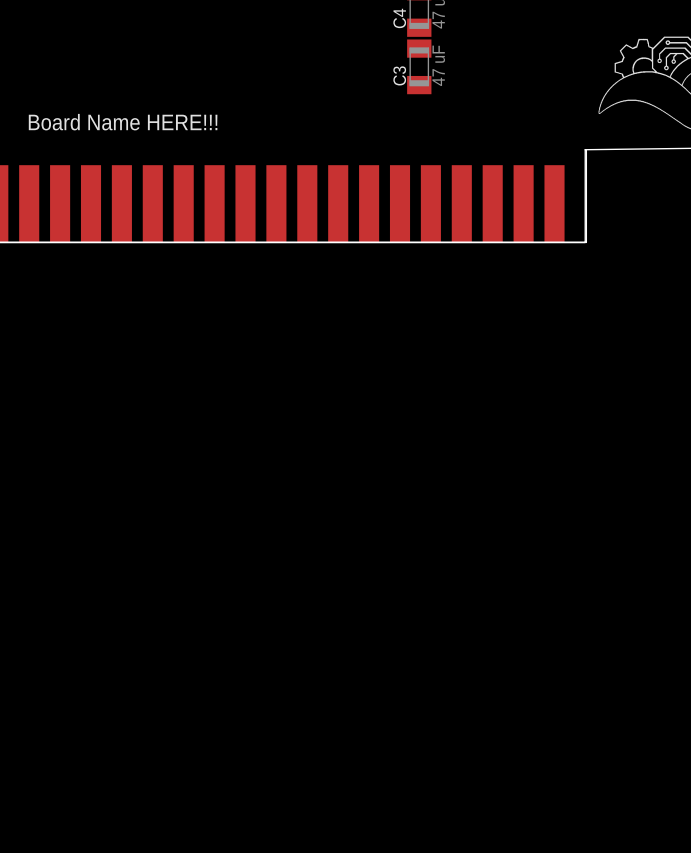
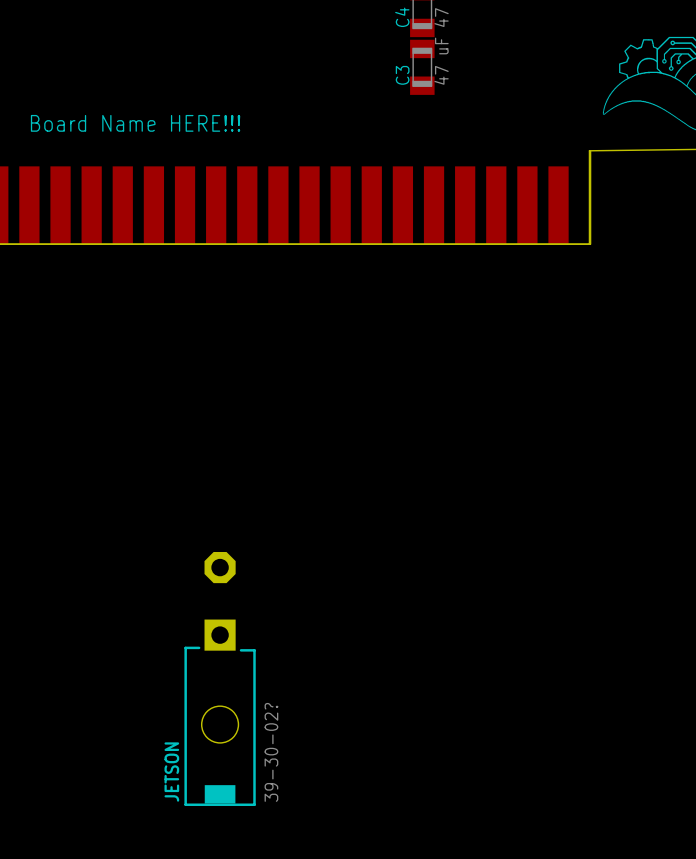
JETSON: none -> 39-30-02? (220, 679)

